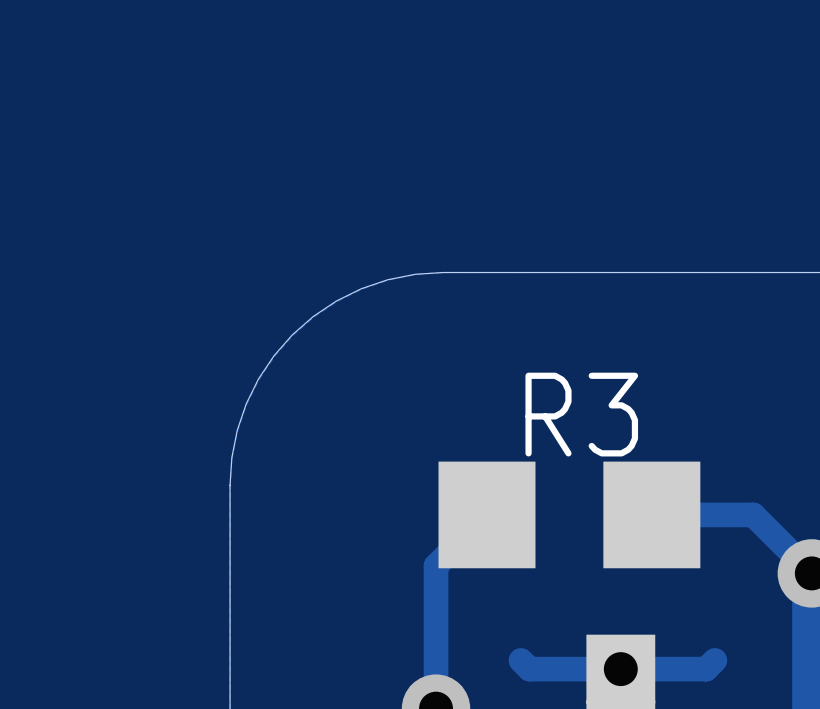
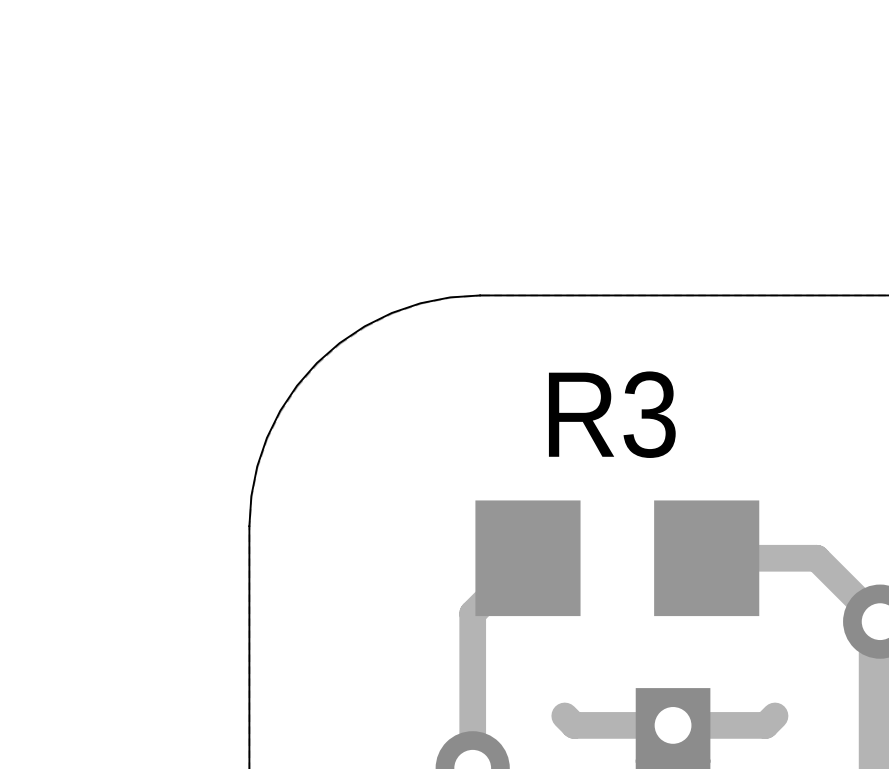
R3 name position: R3 (581, 414) -> R3 (612, 414)

